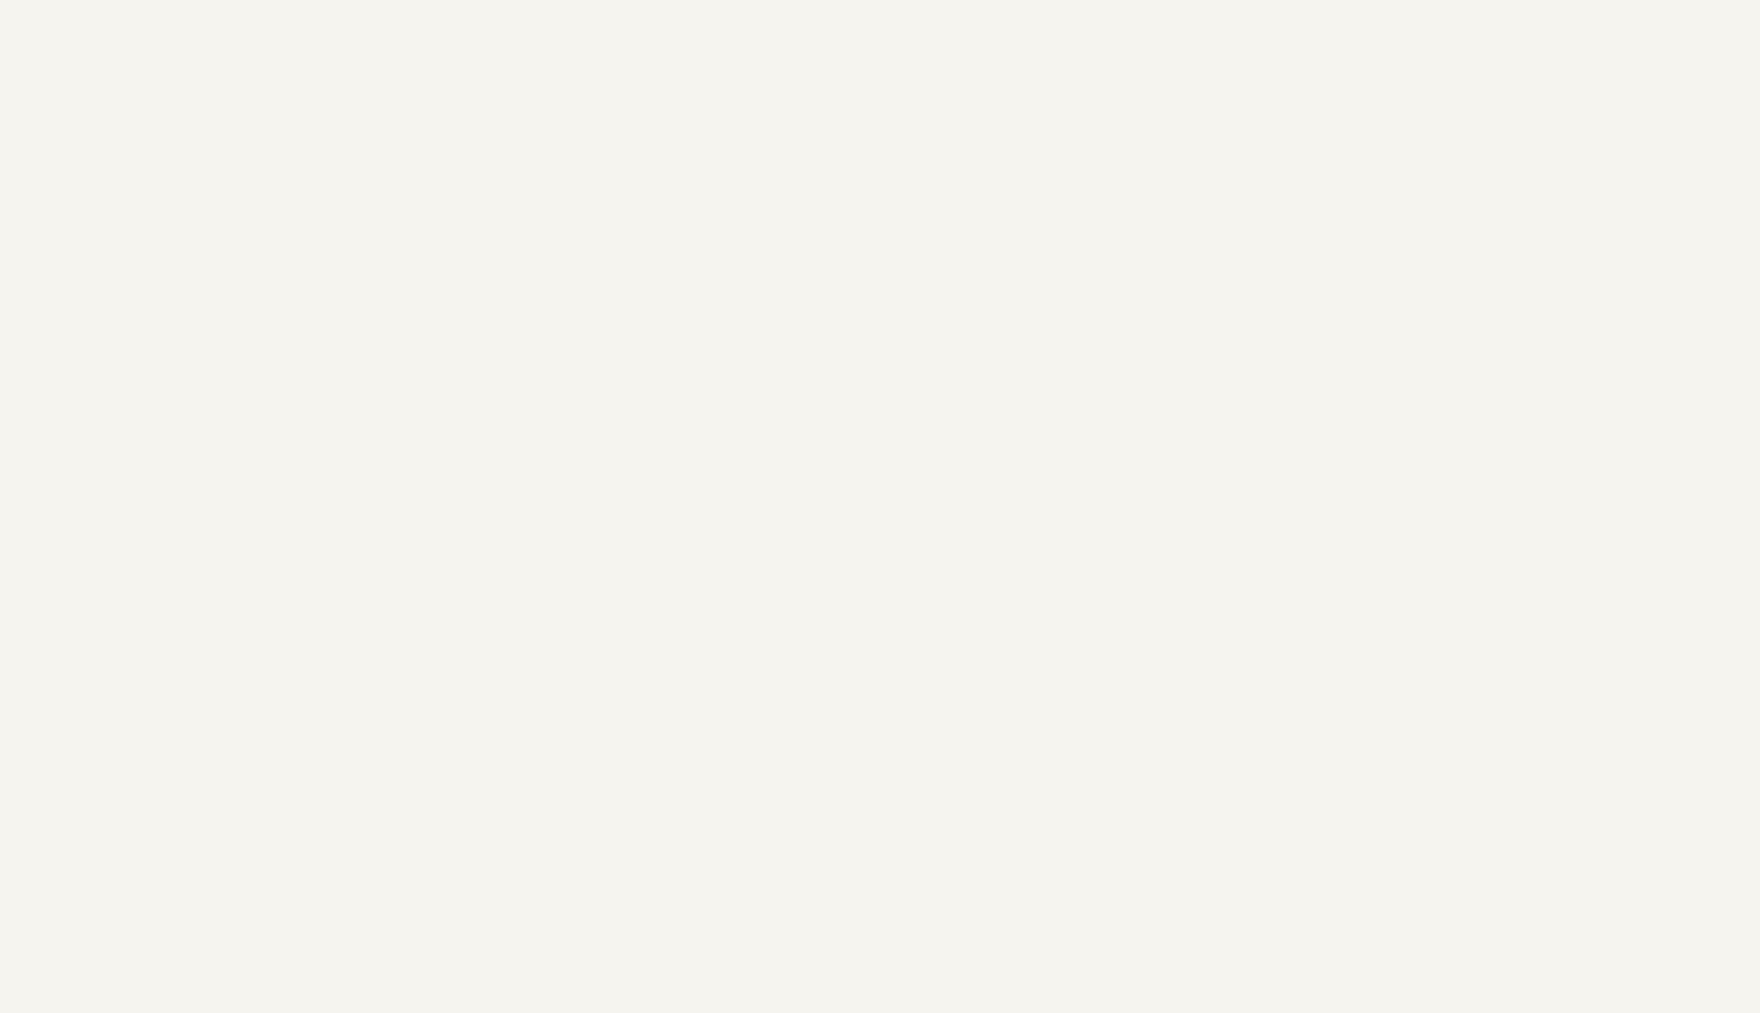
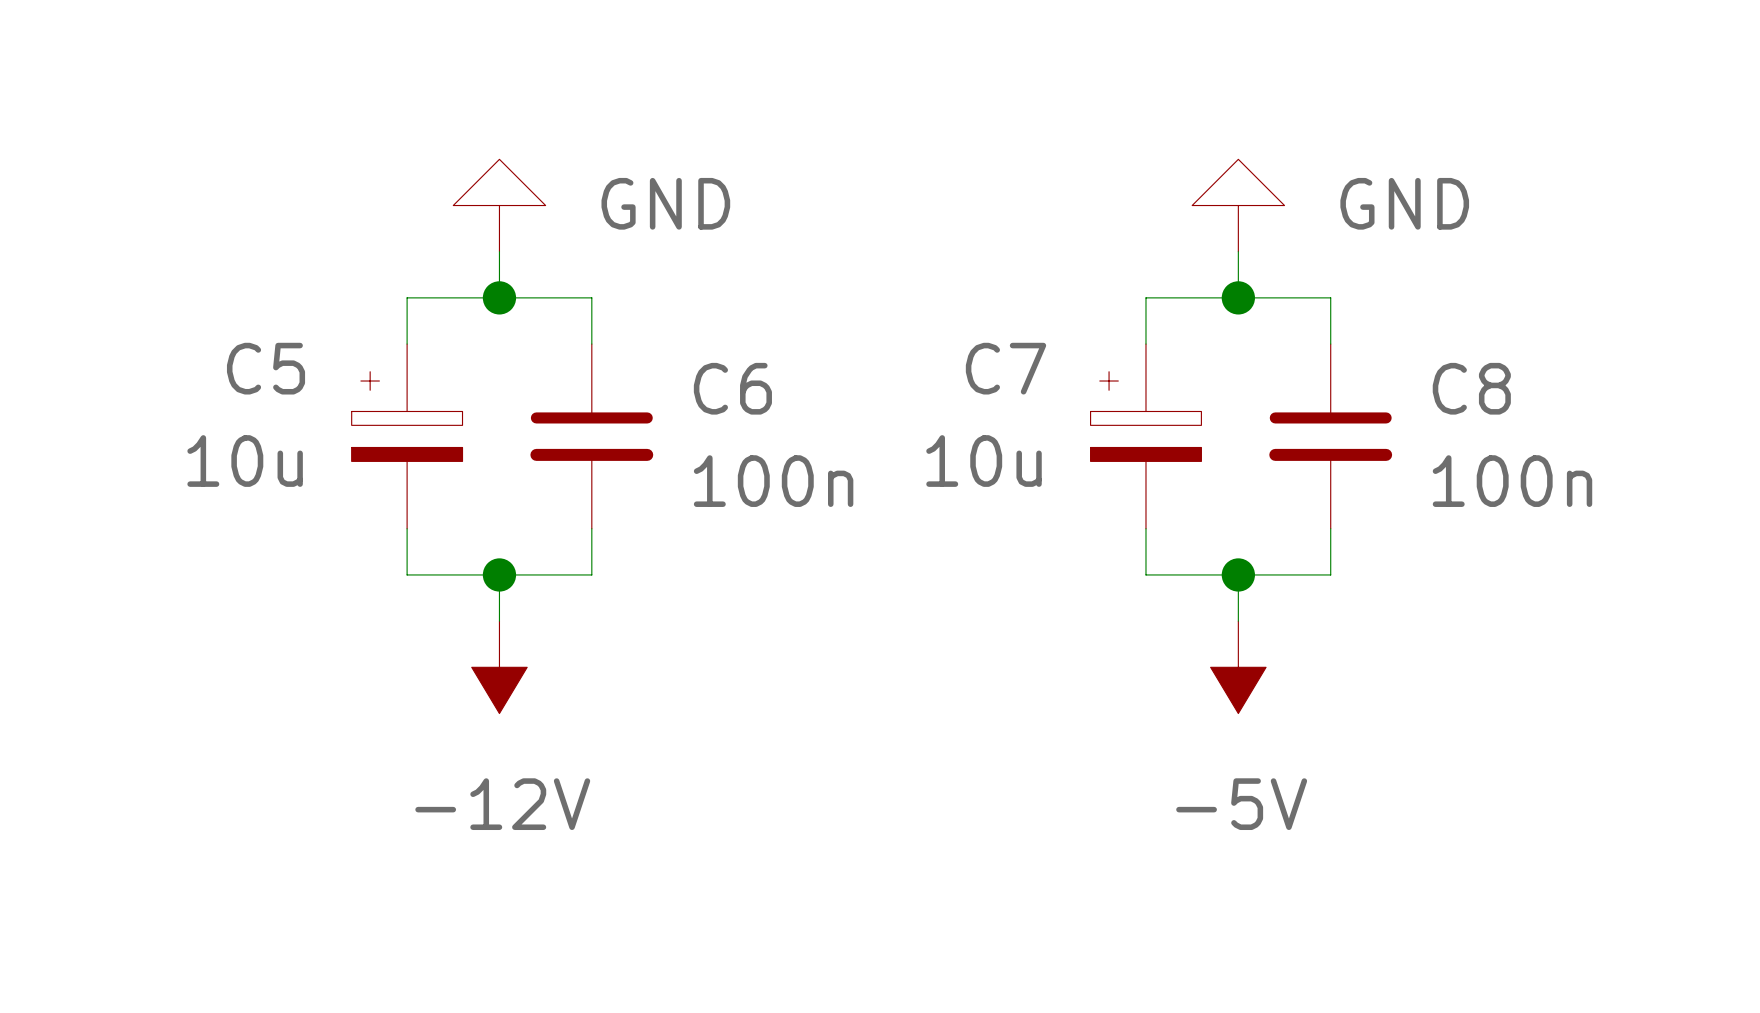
power symbol: none -> GND (499, 205)
power symbol: none -> GND (1238, 205)
wire: none -> (499, 251) (499, 297)
wire: none -> (1238, 251) (1238, 297)
junction: none -> (499, 297)
junction: none -> (1238, 297)
wire: none -> (407, 344) (407, 297) (591, 297) (591, 344)
wire: none -> (1145, 344) (1145, 297) (1330, 297) (1330, 344)
C5: none -> 10u (407, 436)
C6: none -> 100n (591, 436)
C7: none -> 10u (1145, 436)
C8: none -> 100n (1330, 436)
wire: none -> (407, 528) (407, 574) (591, 574) (591, 528)
wire: none -> (1145, 528) (1145, 574) (1330, 574) (1330, 528)
wire: none -> (499, 574) (499, 621)
junction: none -> (499, 574)
wire: none -> (1238, 574) (1238, 621)
junction: none -> (1238, 574)
power symbol: none -> -12V (499, 667)
power symbol: none -> -5V (1238, 667)

